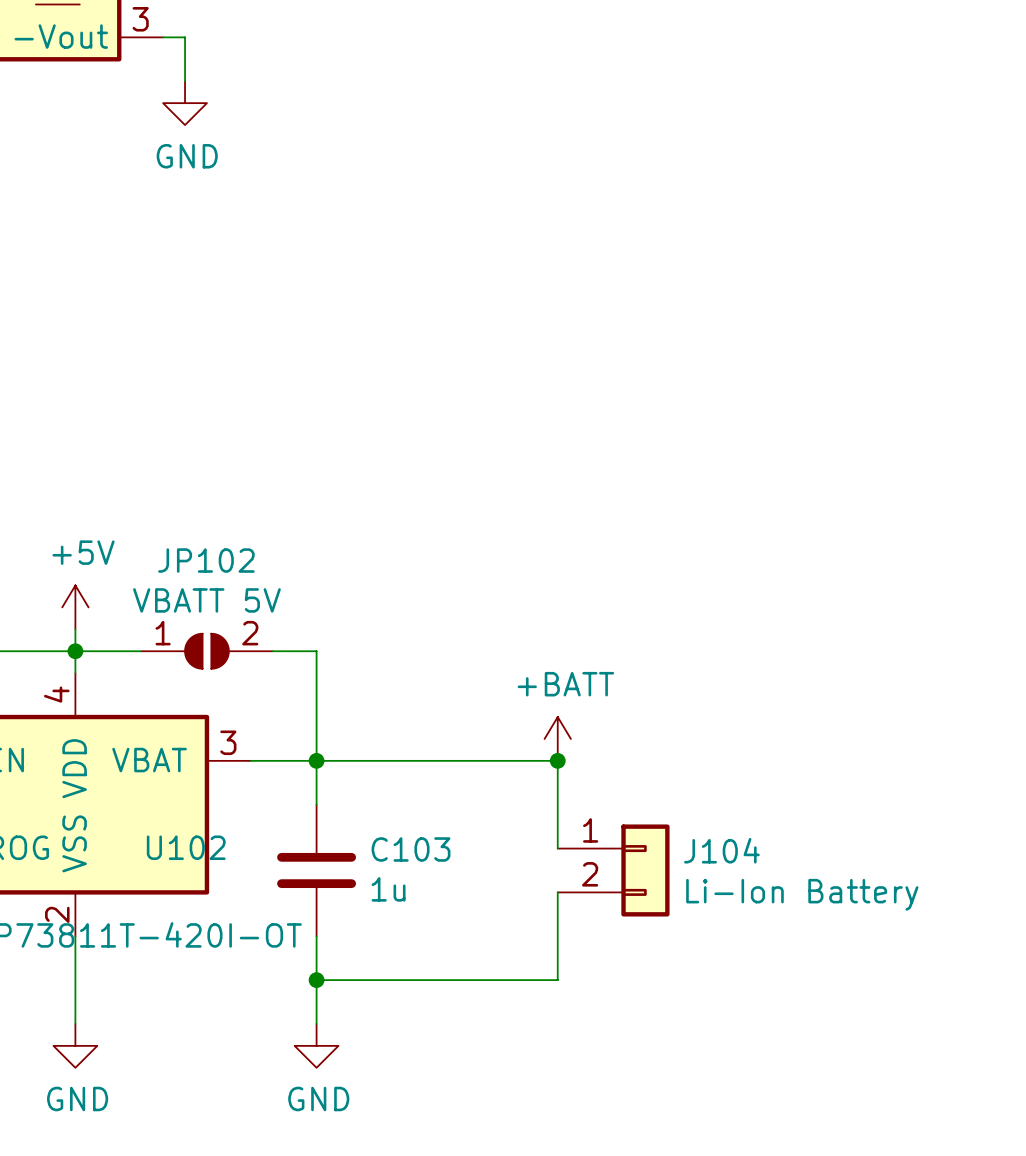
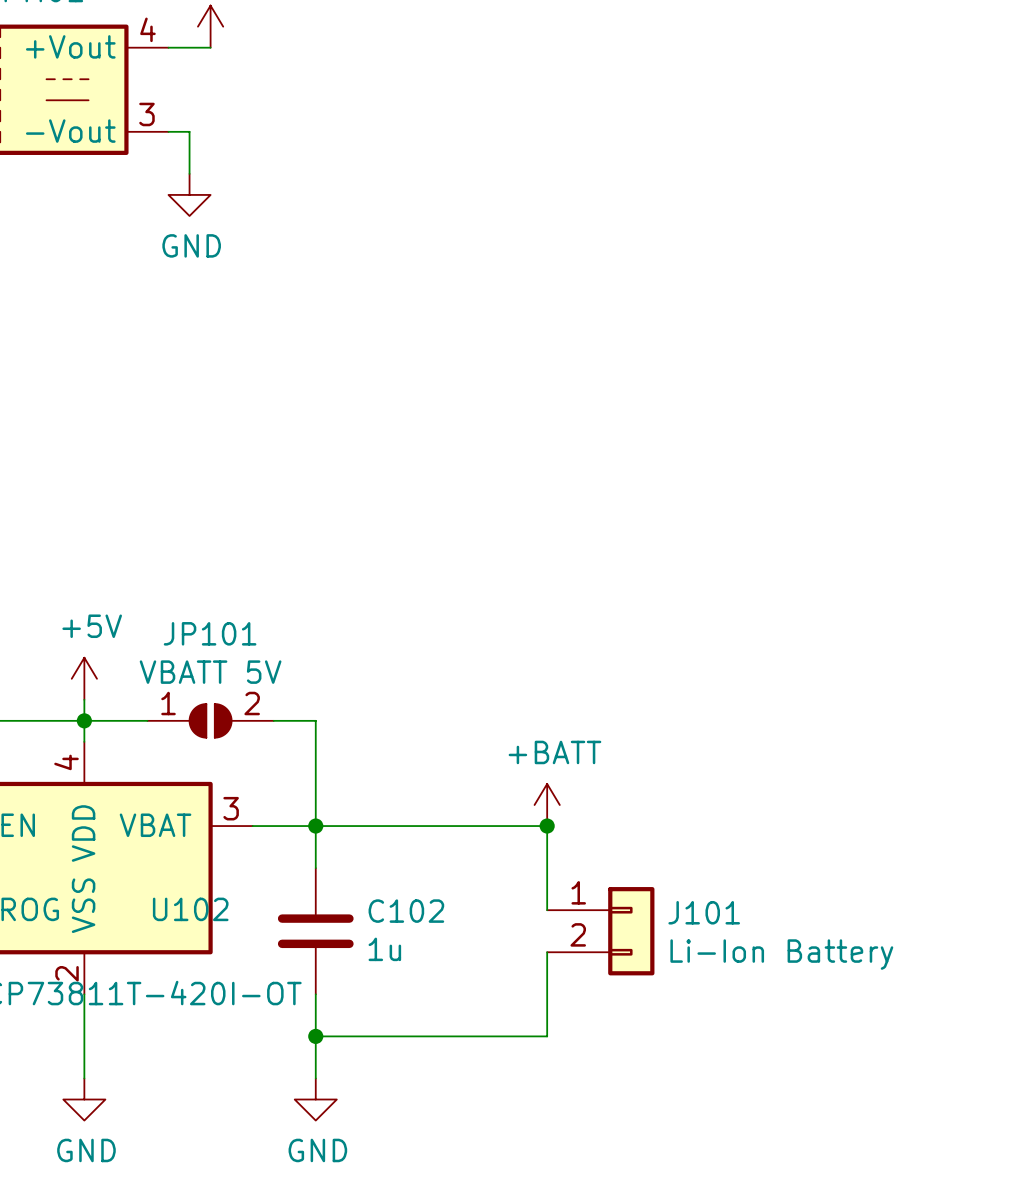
JP102 name: JP102 (206, 560) -> JP101 (210, 633)
C103 name: C103 (411, 849) -> C102 (406, 911)
J104 name: J104 (721, 850) -> J101 (704, 912)

